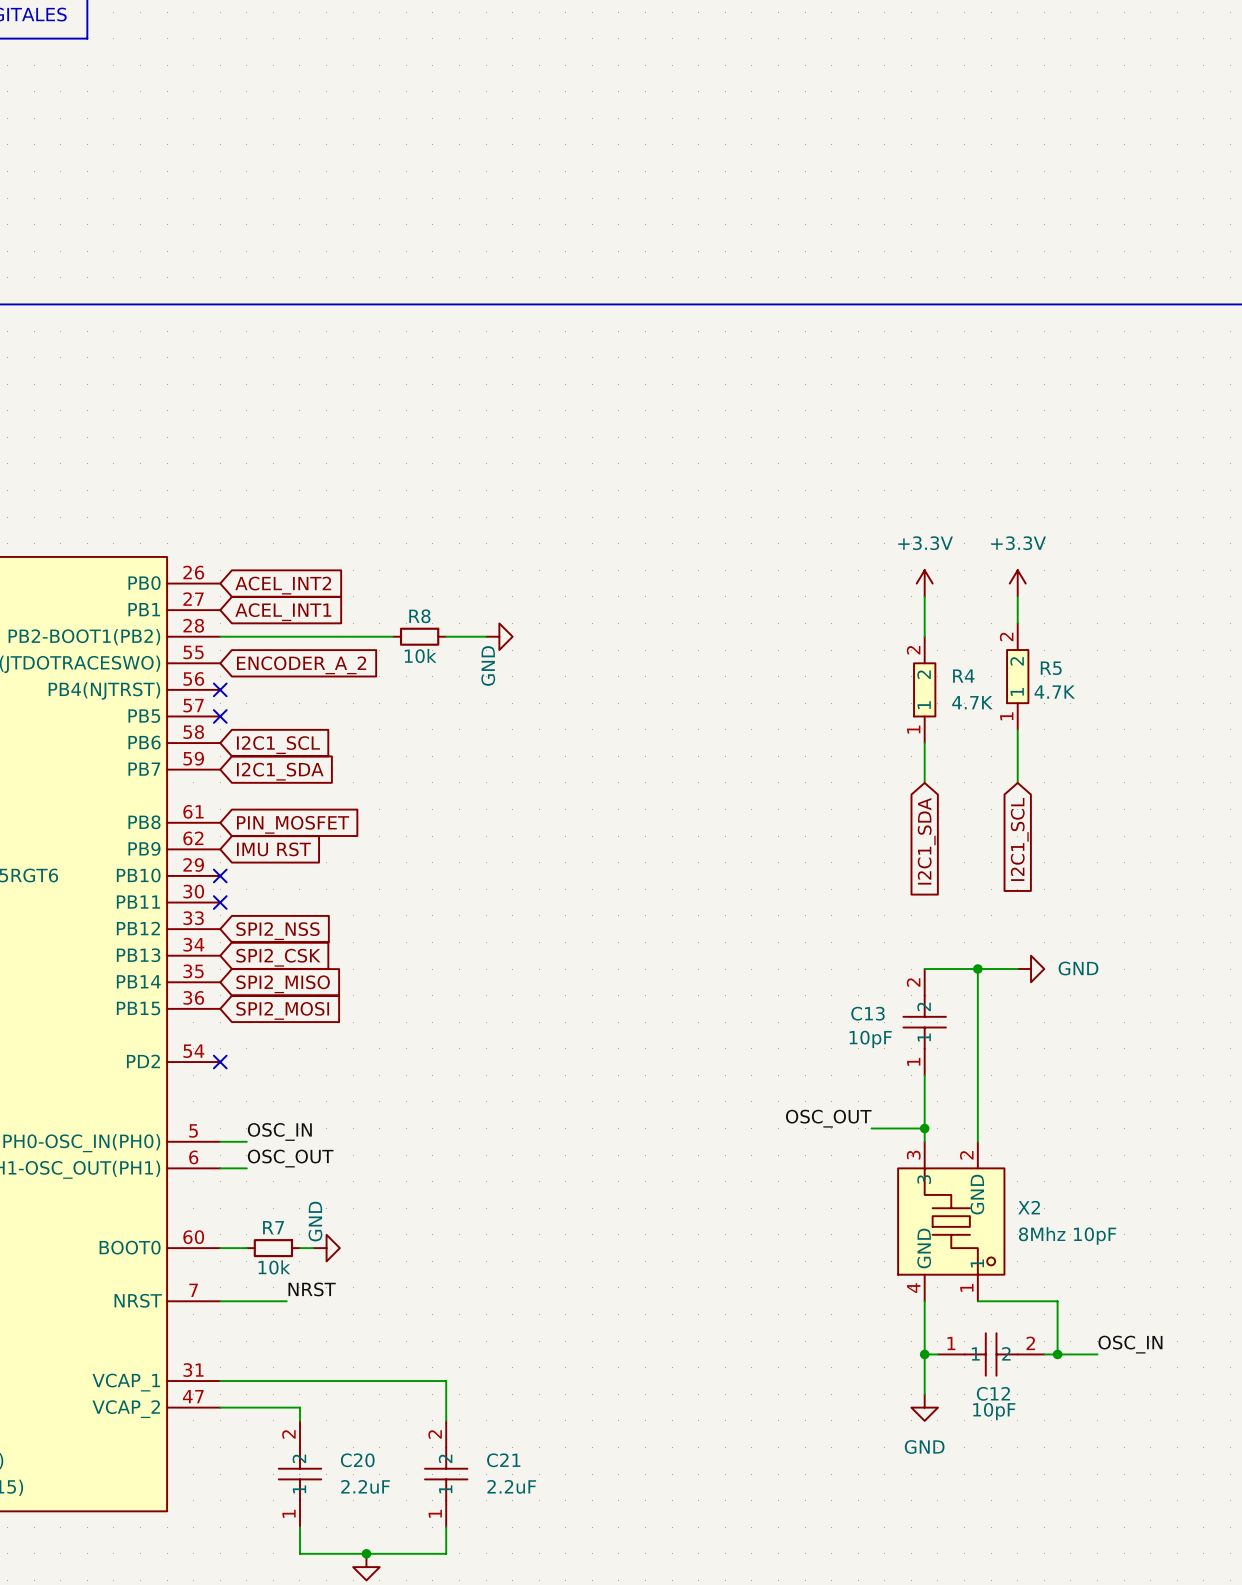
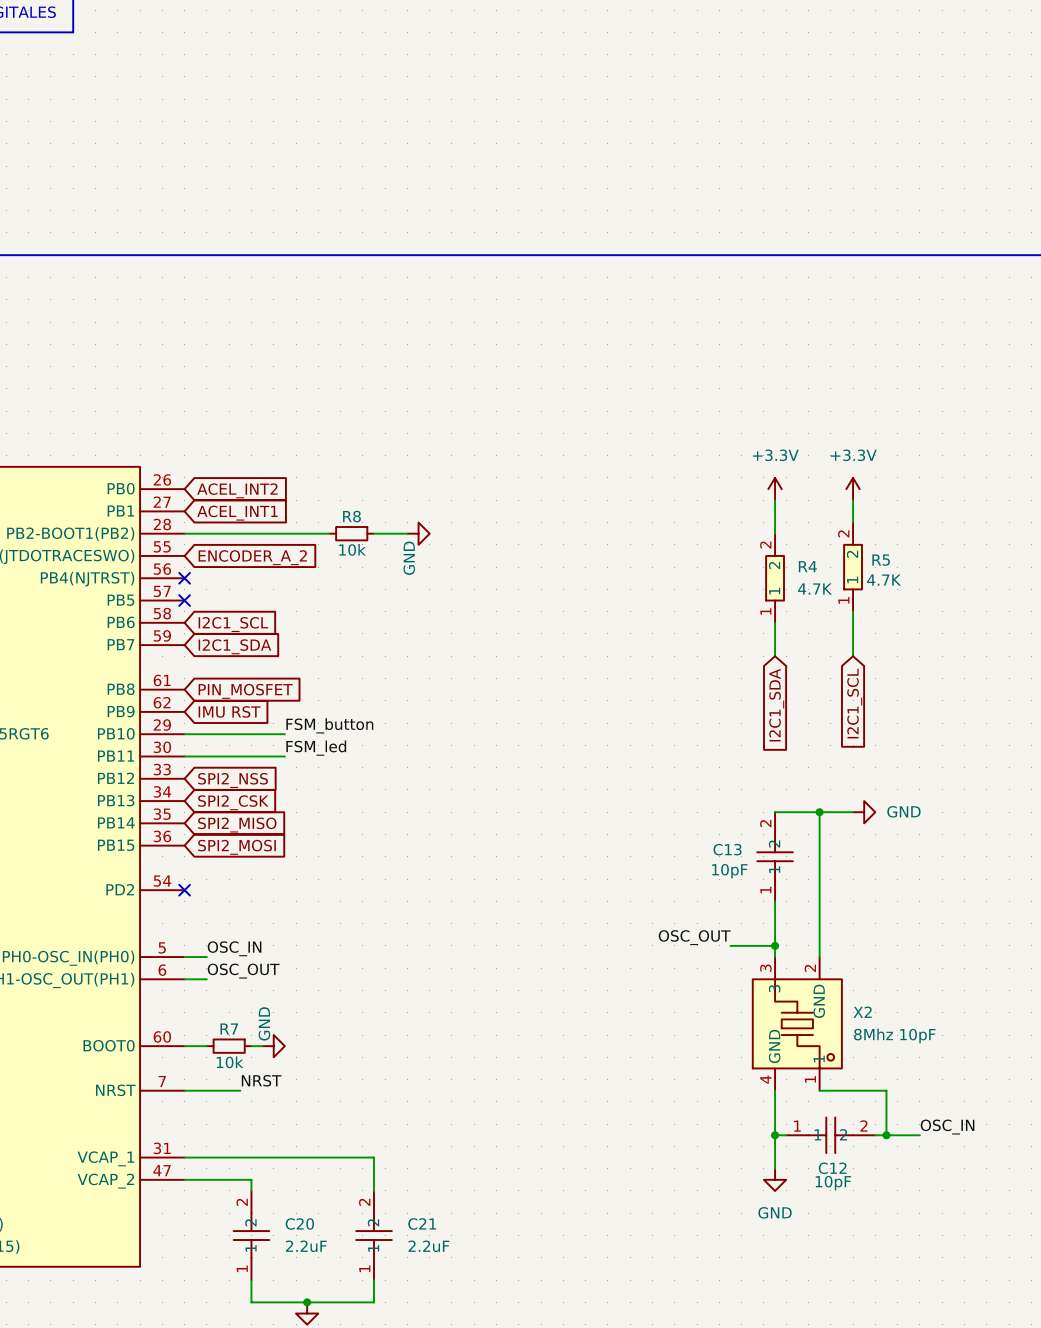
label: none -> FSM_button (329, 725)
wire: none -> (184, 734) (284, 734)
no-connect mark: (220, 875) -> none
label: none -> FSM_led (316, 748)
wire: none -> (184, 756) (284, 756)
no-connect mark: (220, 902) -> none

